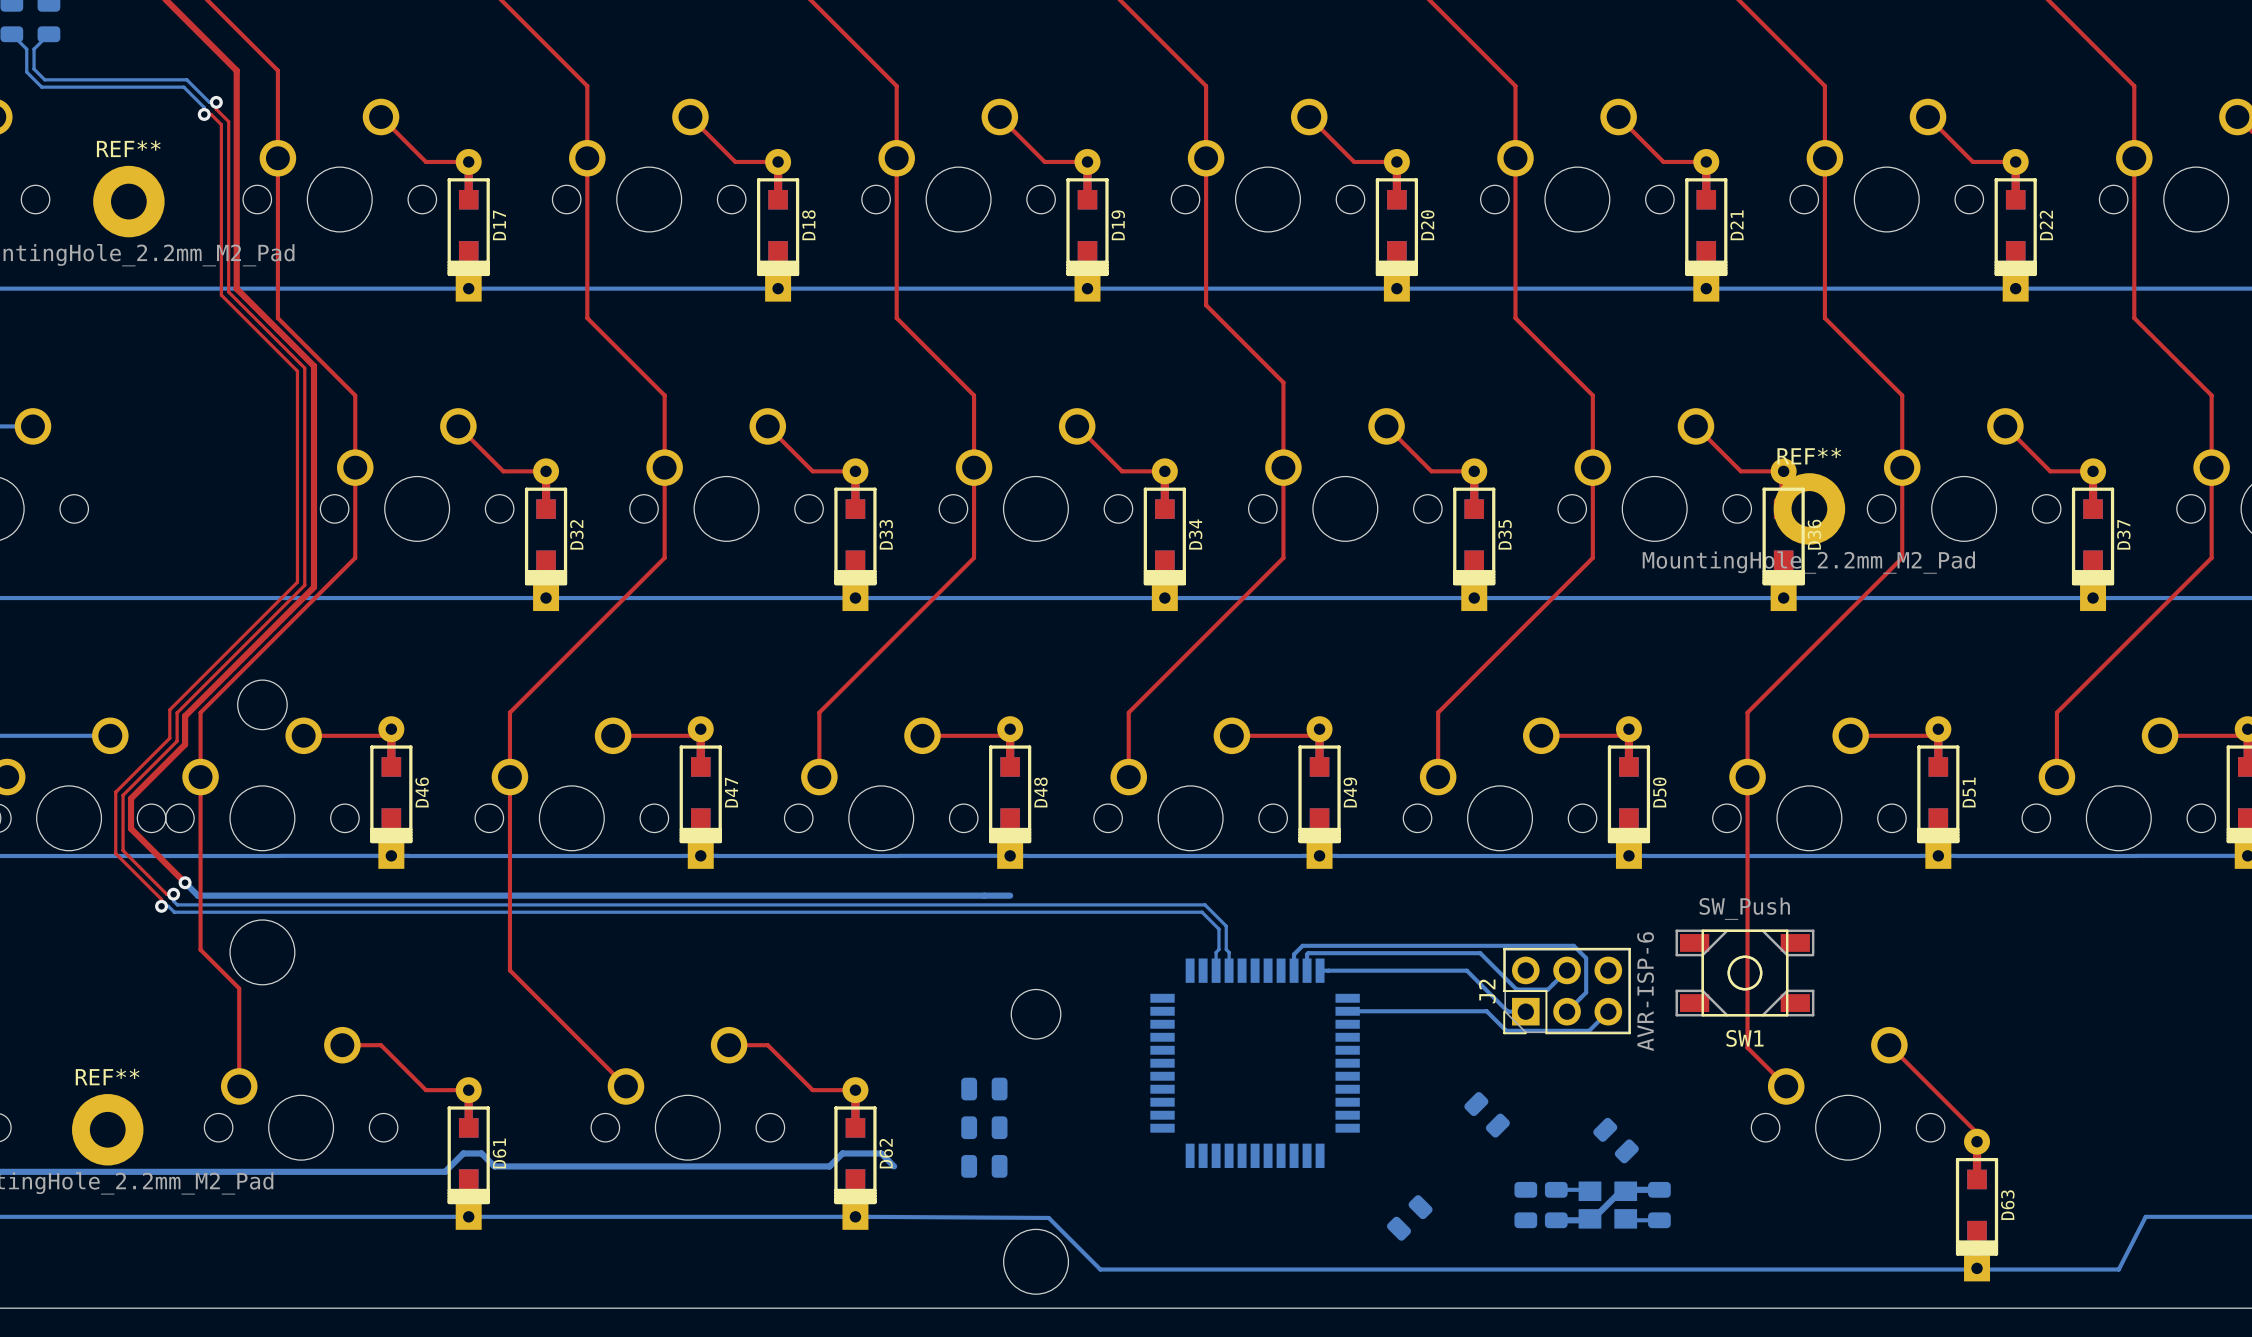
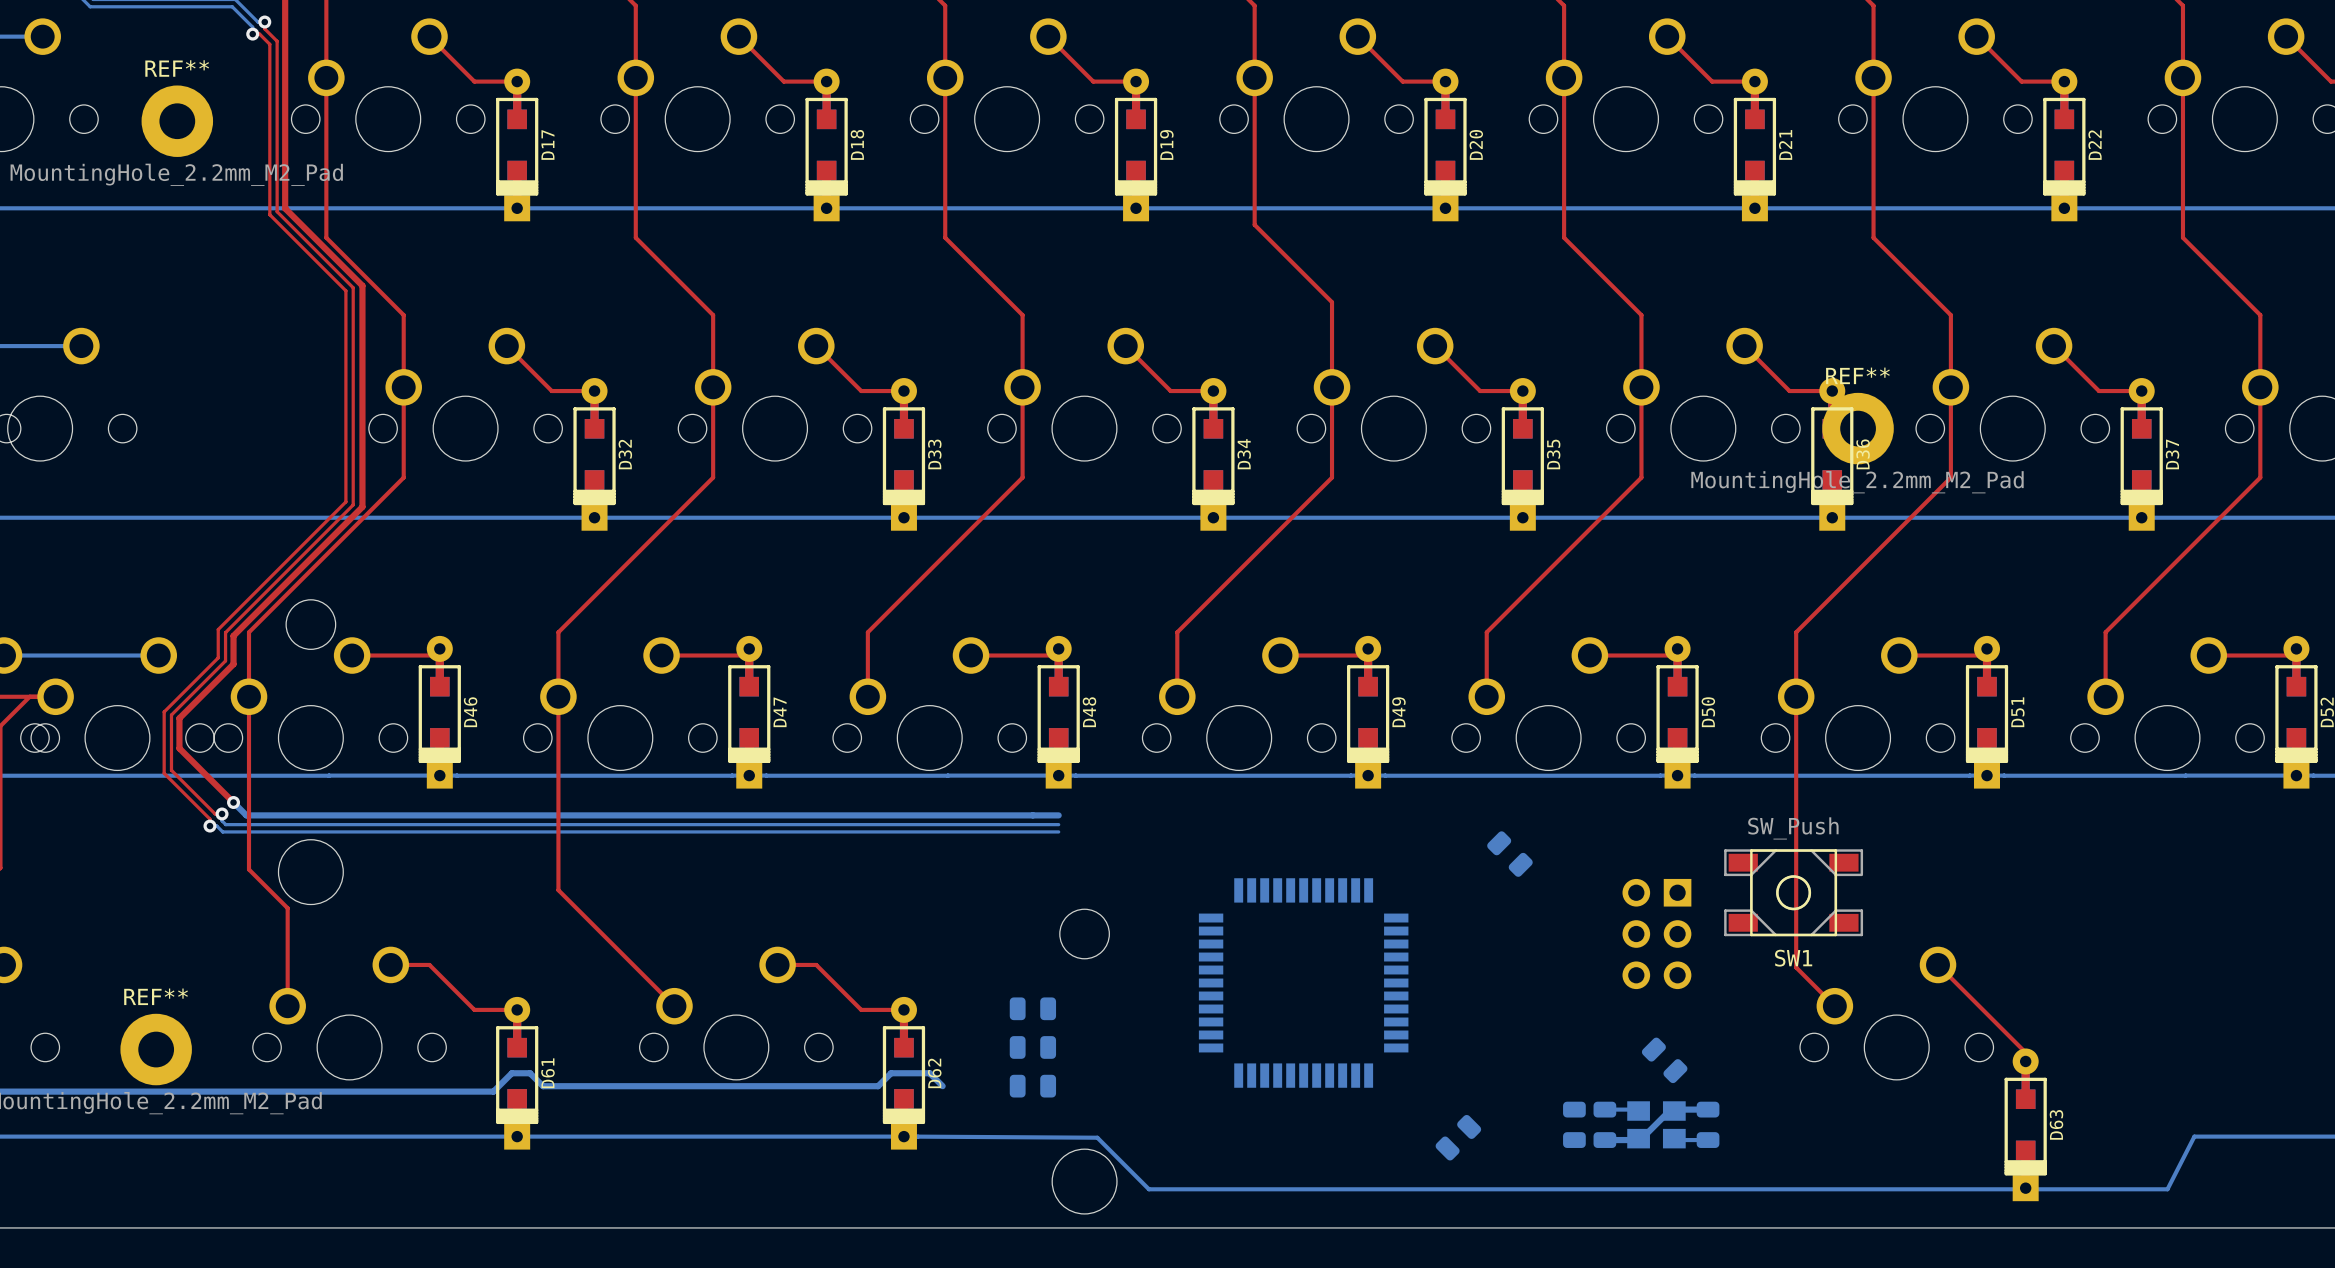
bottom track: (1010, 904) (1205, 904) (1226, 926) (1229, 970) -> none
bottom track: (1010, 912) (1202, 912) (1218, 929) (1216, 970) -> none
bottom track: (1294, 970) (1294, 954) (1302, 945) (1573, 945) (1586, 958) (1586, 992) (1567, 1011) -> none
bottom track: (1320, 970) (1466, 970) (1507, 1011) (1525, 1011) -> none
bottom track: (1567, 970) (1547, 989) (1516, 989) (1480, 953) (1308, 953) (1307, 970) -> none
J2 side: top (1567, 991) -> bottom (1656, 934)
bottom track: (1347, 1011) (1486, 1011) (1506, 1030) (1589, 1030) (1608, 1011) -> none
part position: (1487, 1114) -> (1509, 854)

